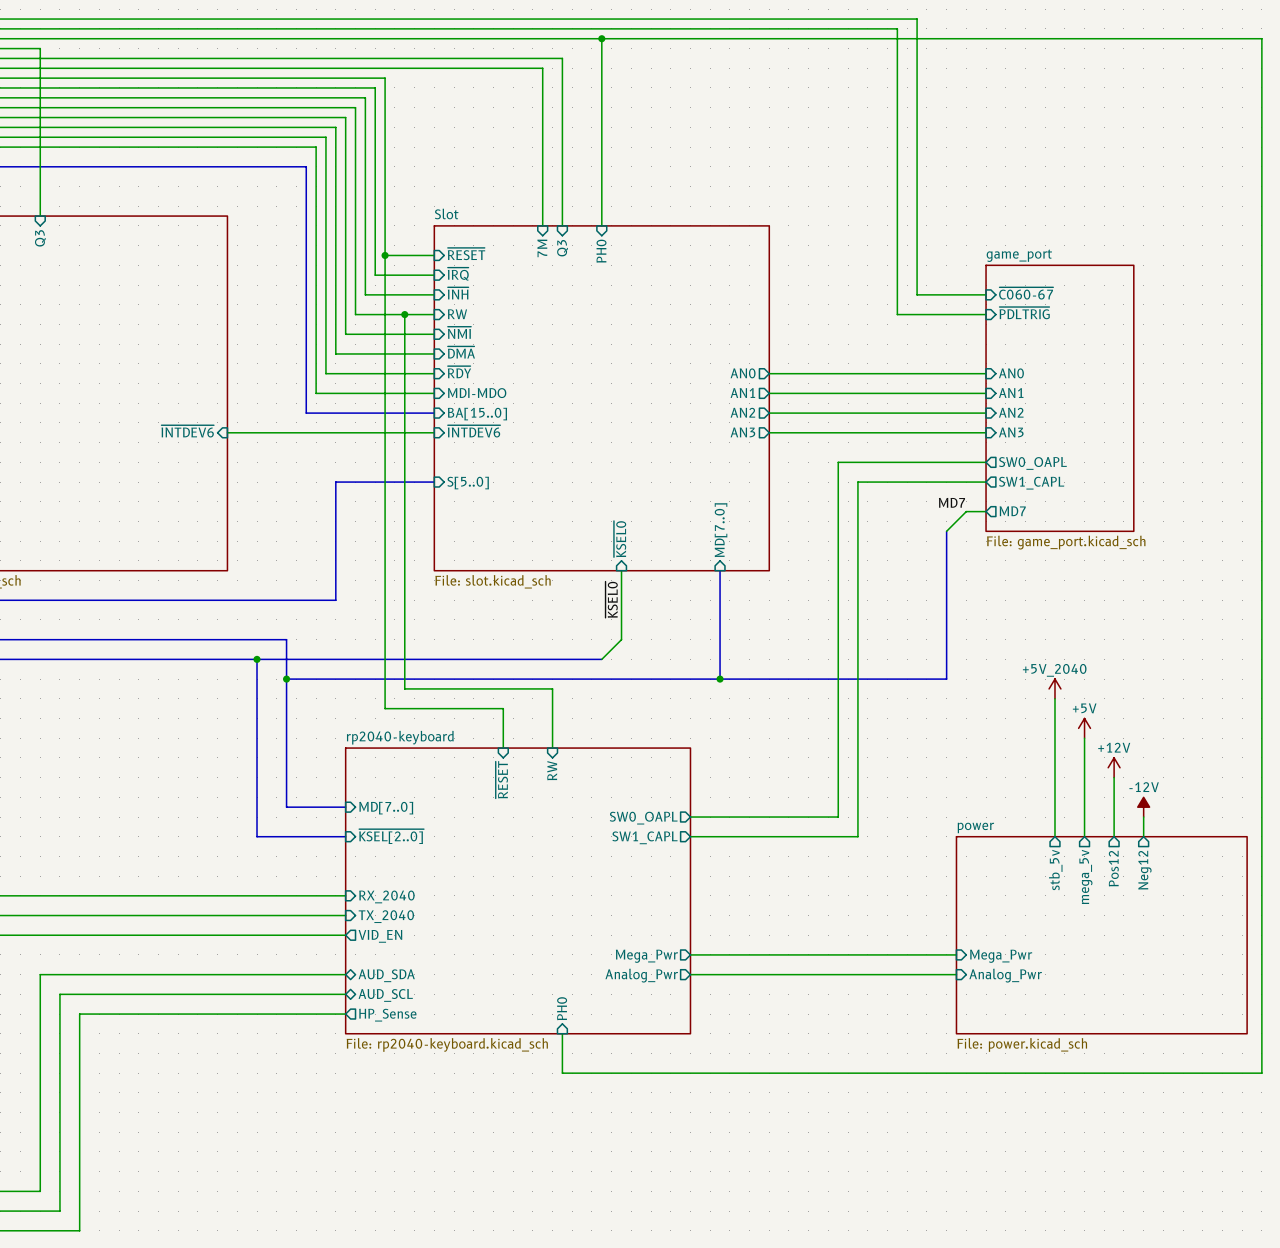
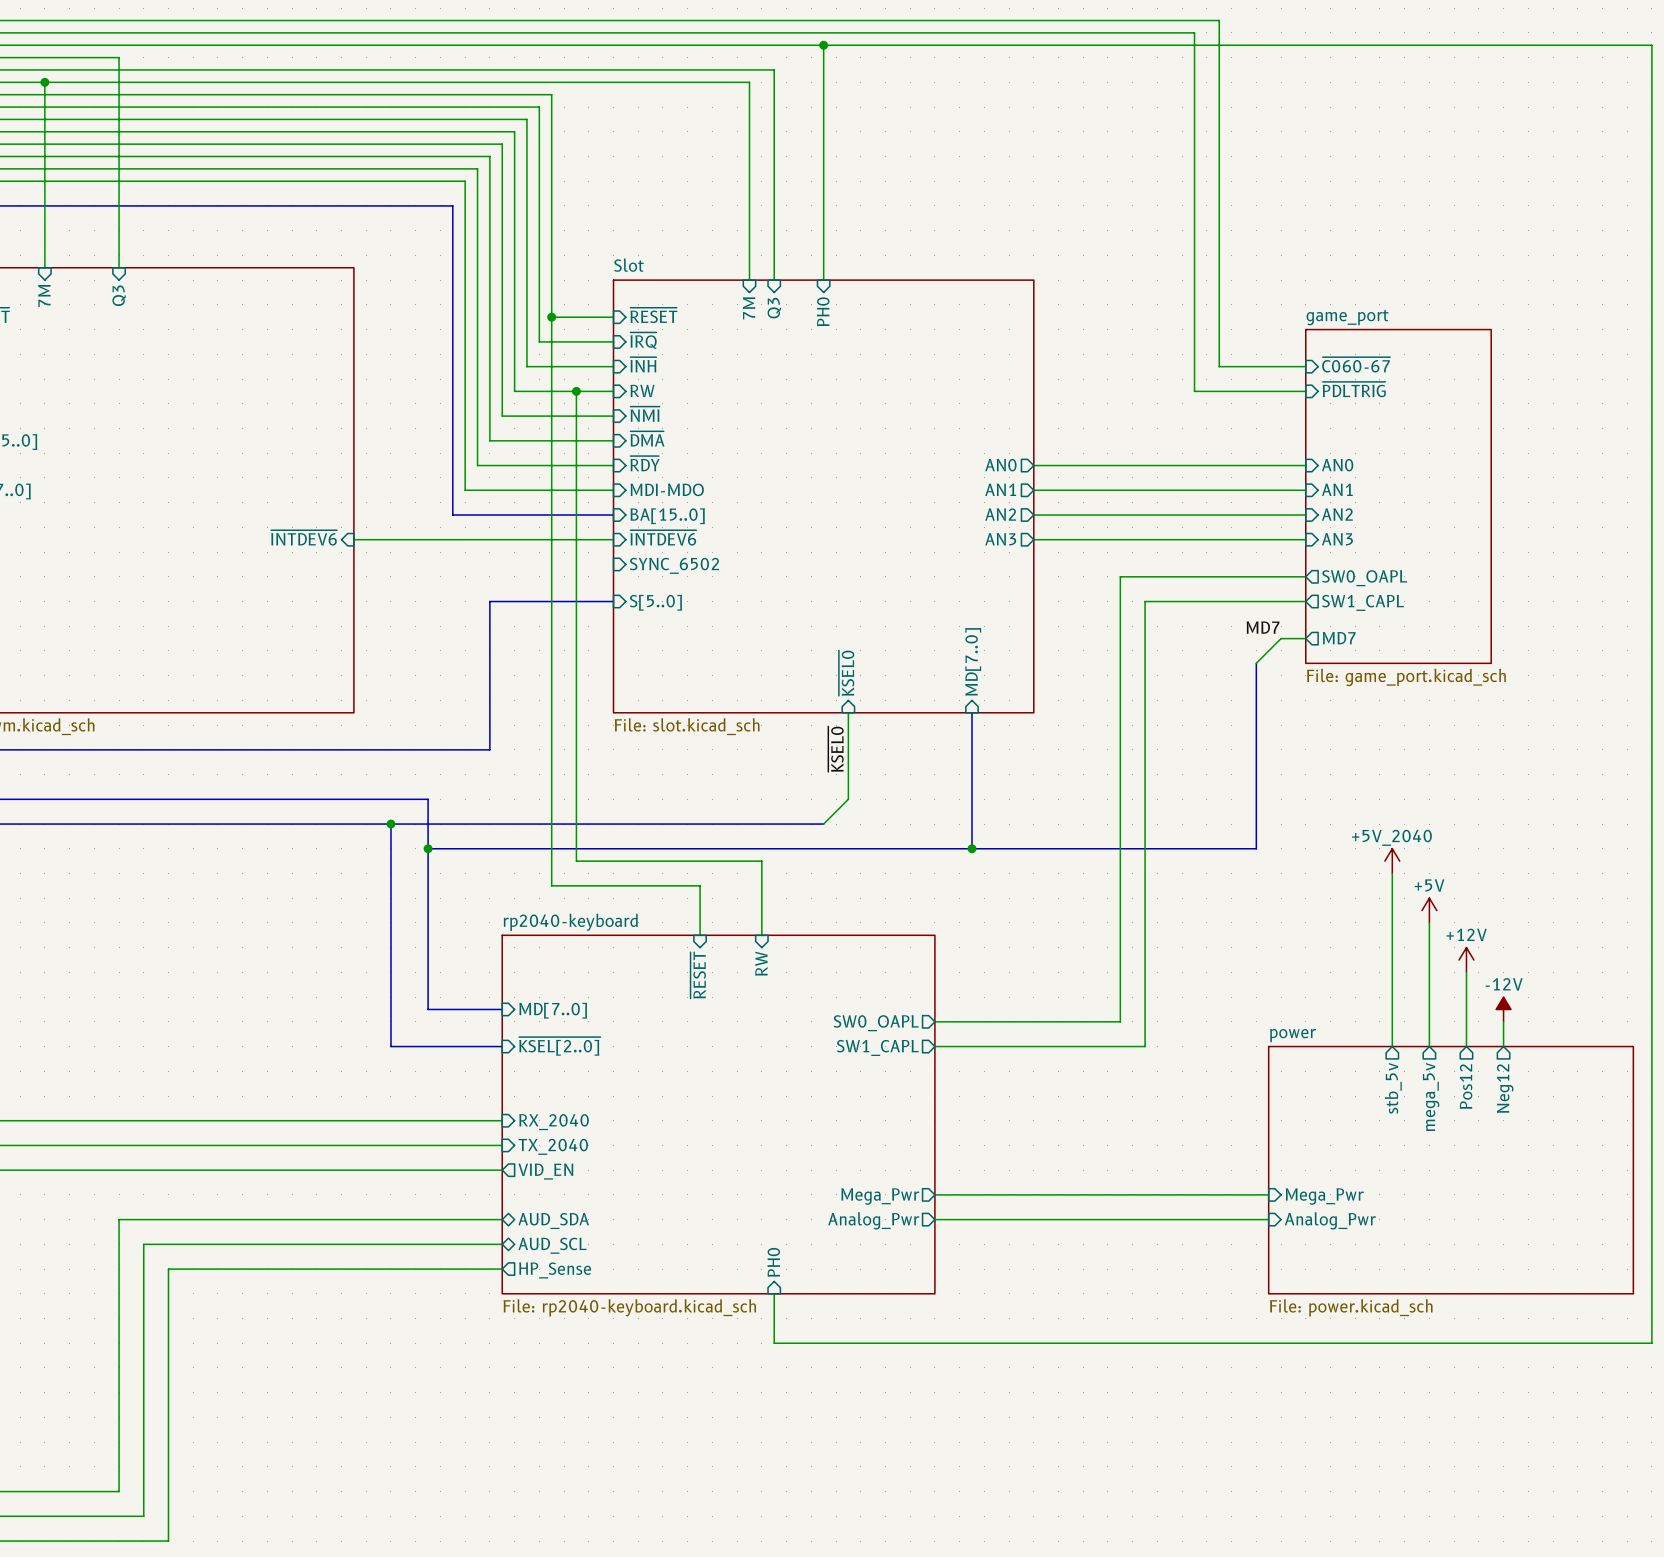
sheet pin: none -> SYNC_6502 (674, 565)

